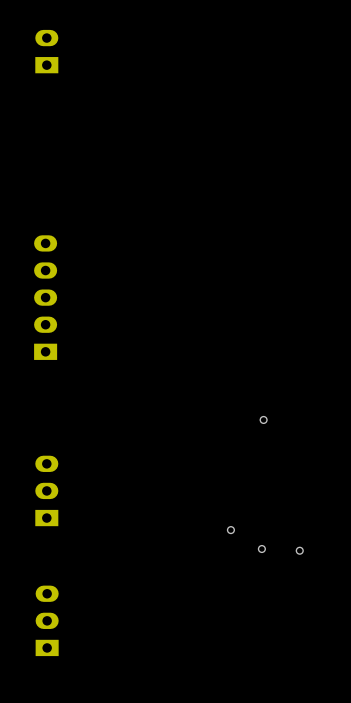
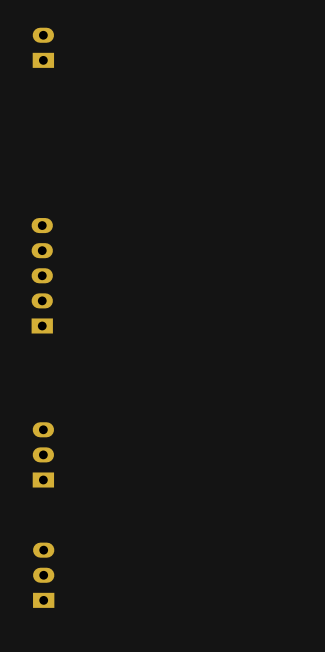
via: (263, 419) -> none
via: (230, 530) -> none
via: (261, 549) -> none
via: (299, 550) -> none

